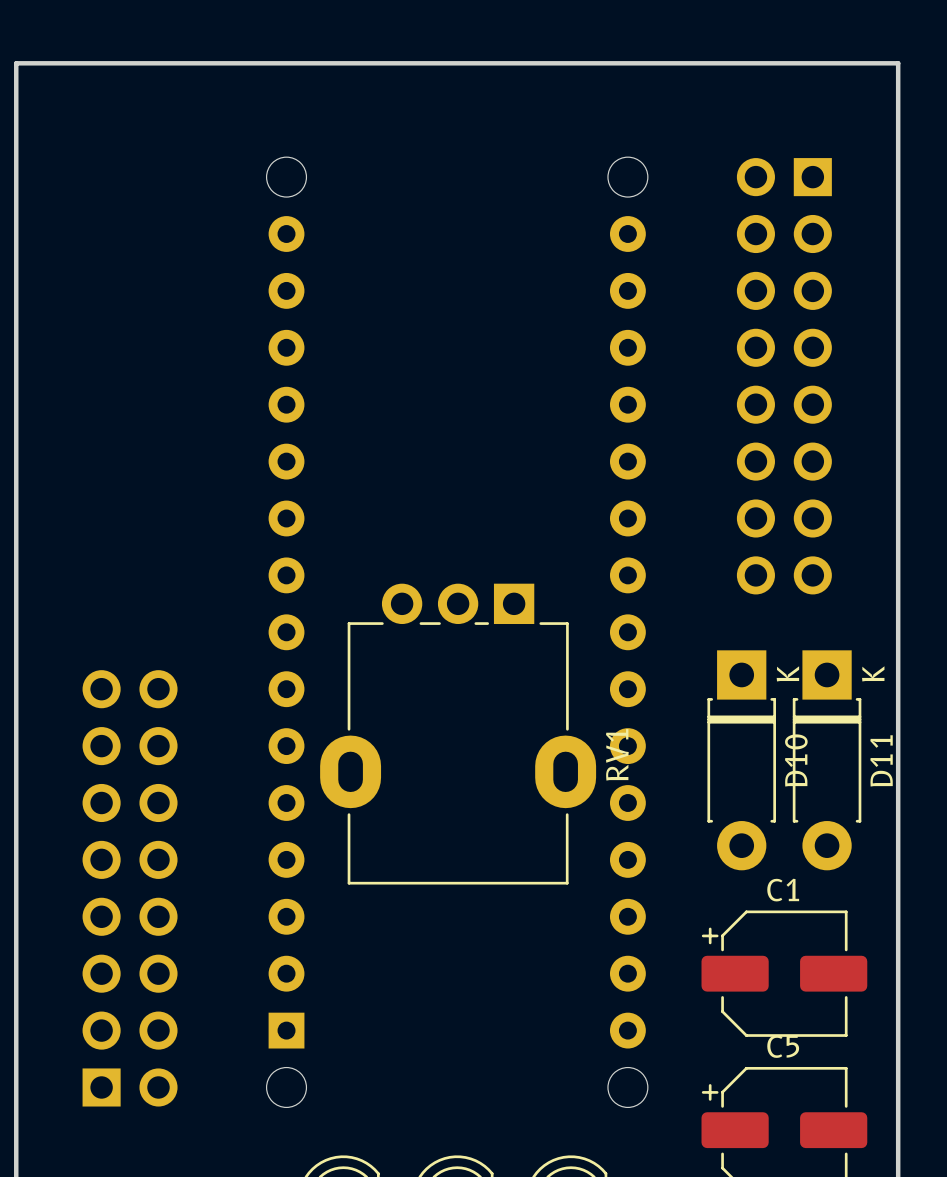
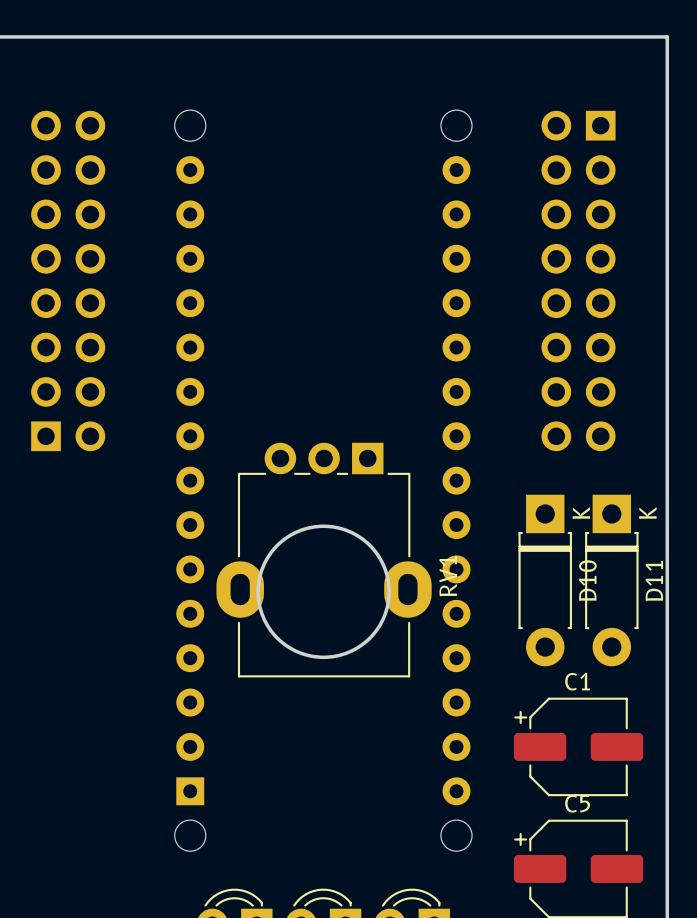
round board edge: none -> [256, 524, 391, 660]
part position: (130, 888) -> (68, 280)

